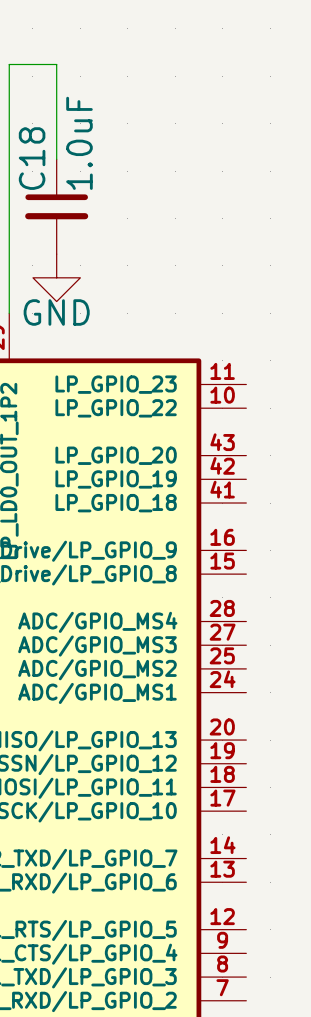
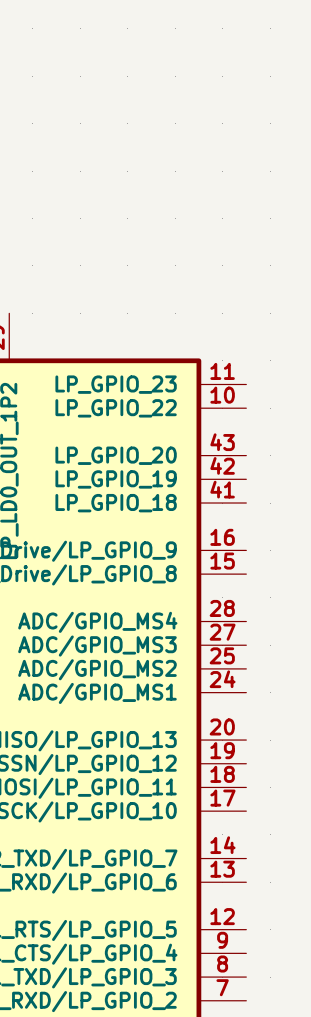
wire: (56, 159) (56, 64) (9, 64) (9, 313) -> none
C18: 1.0uF (56, 206) -> none
power symbol: GND (56, 277) -> none

